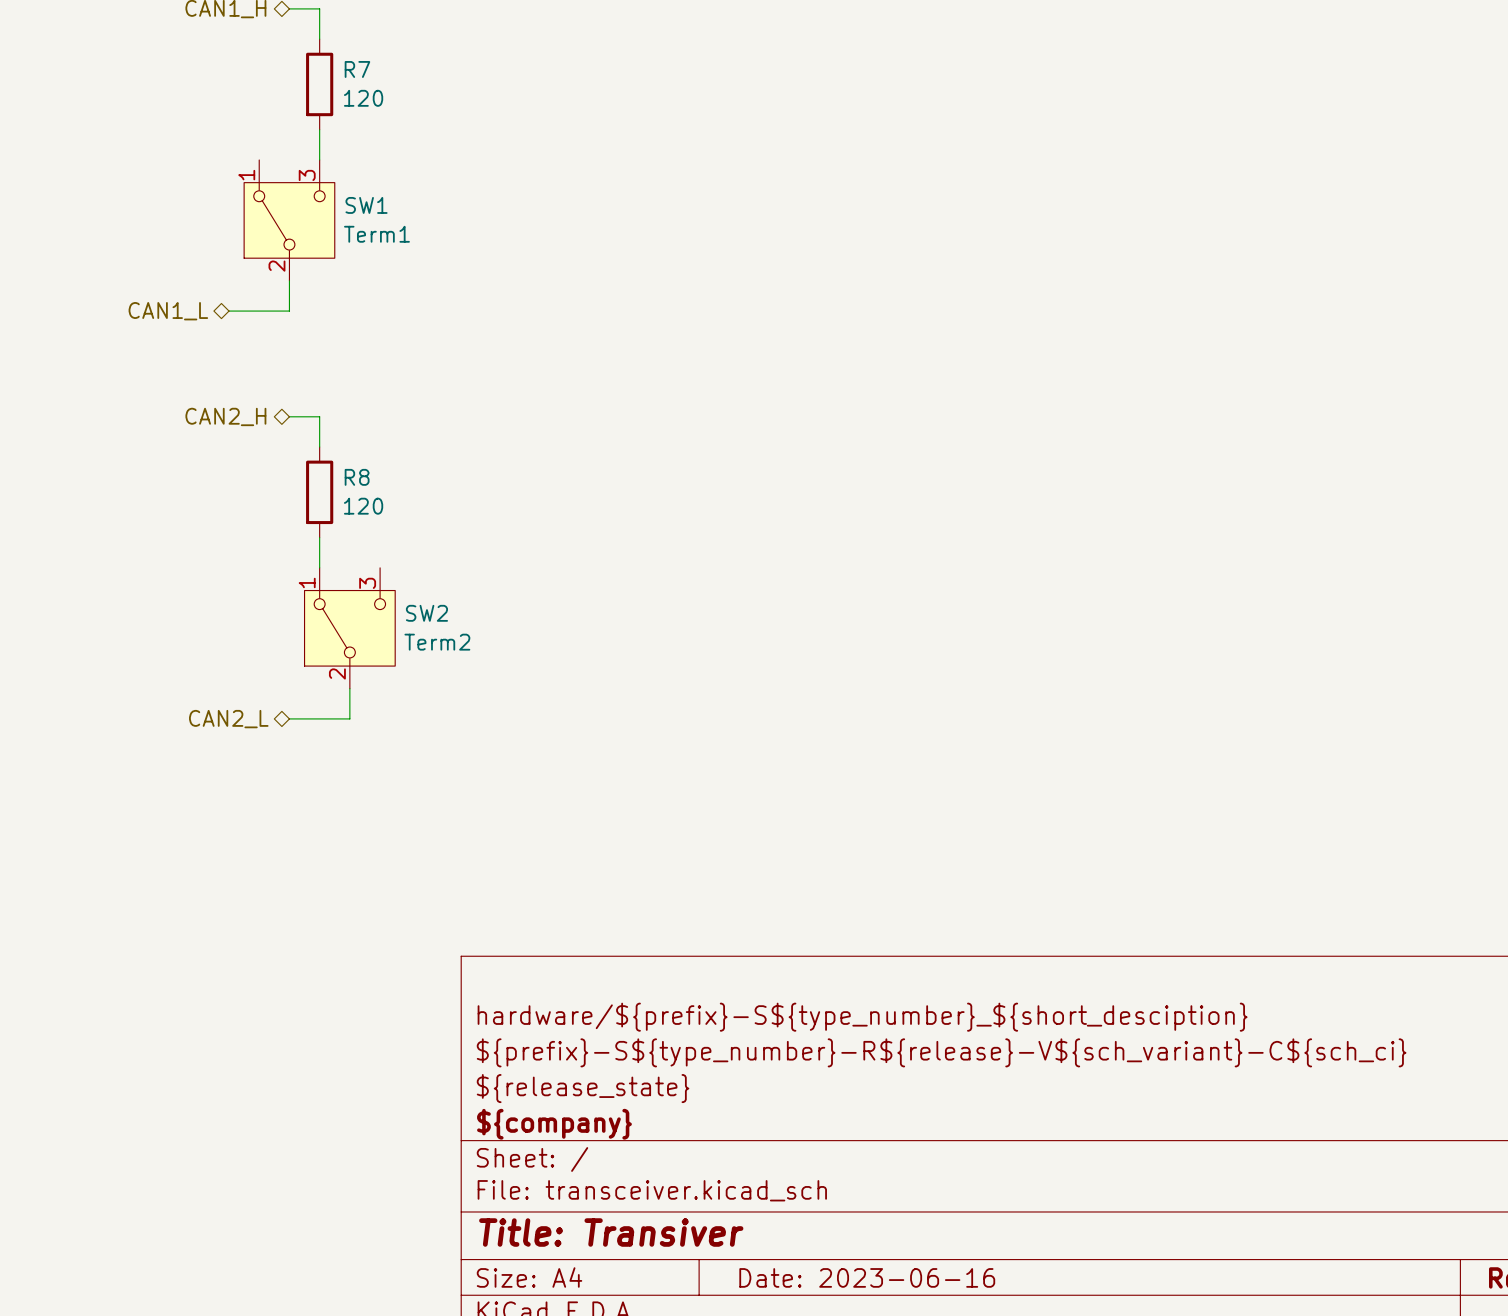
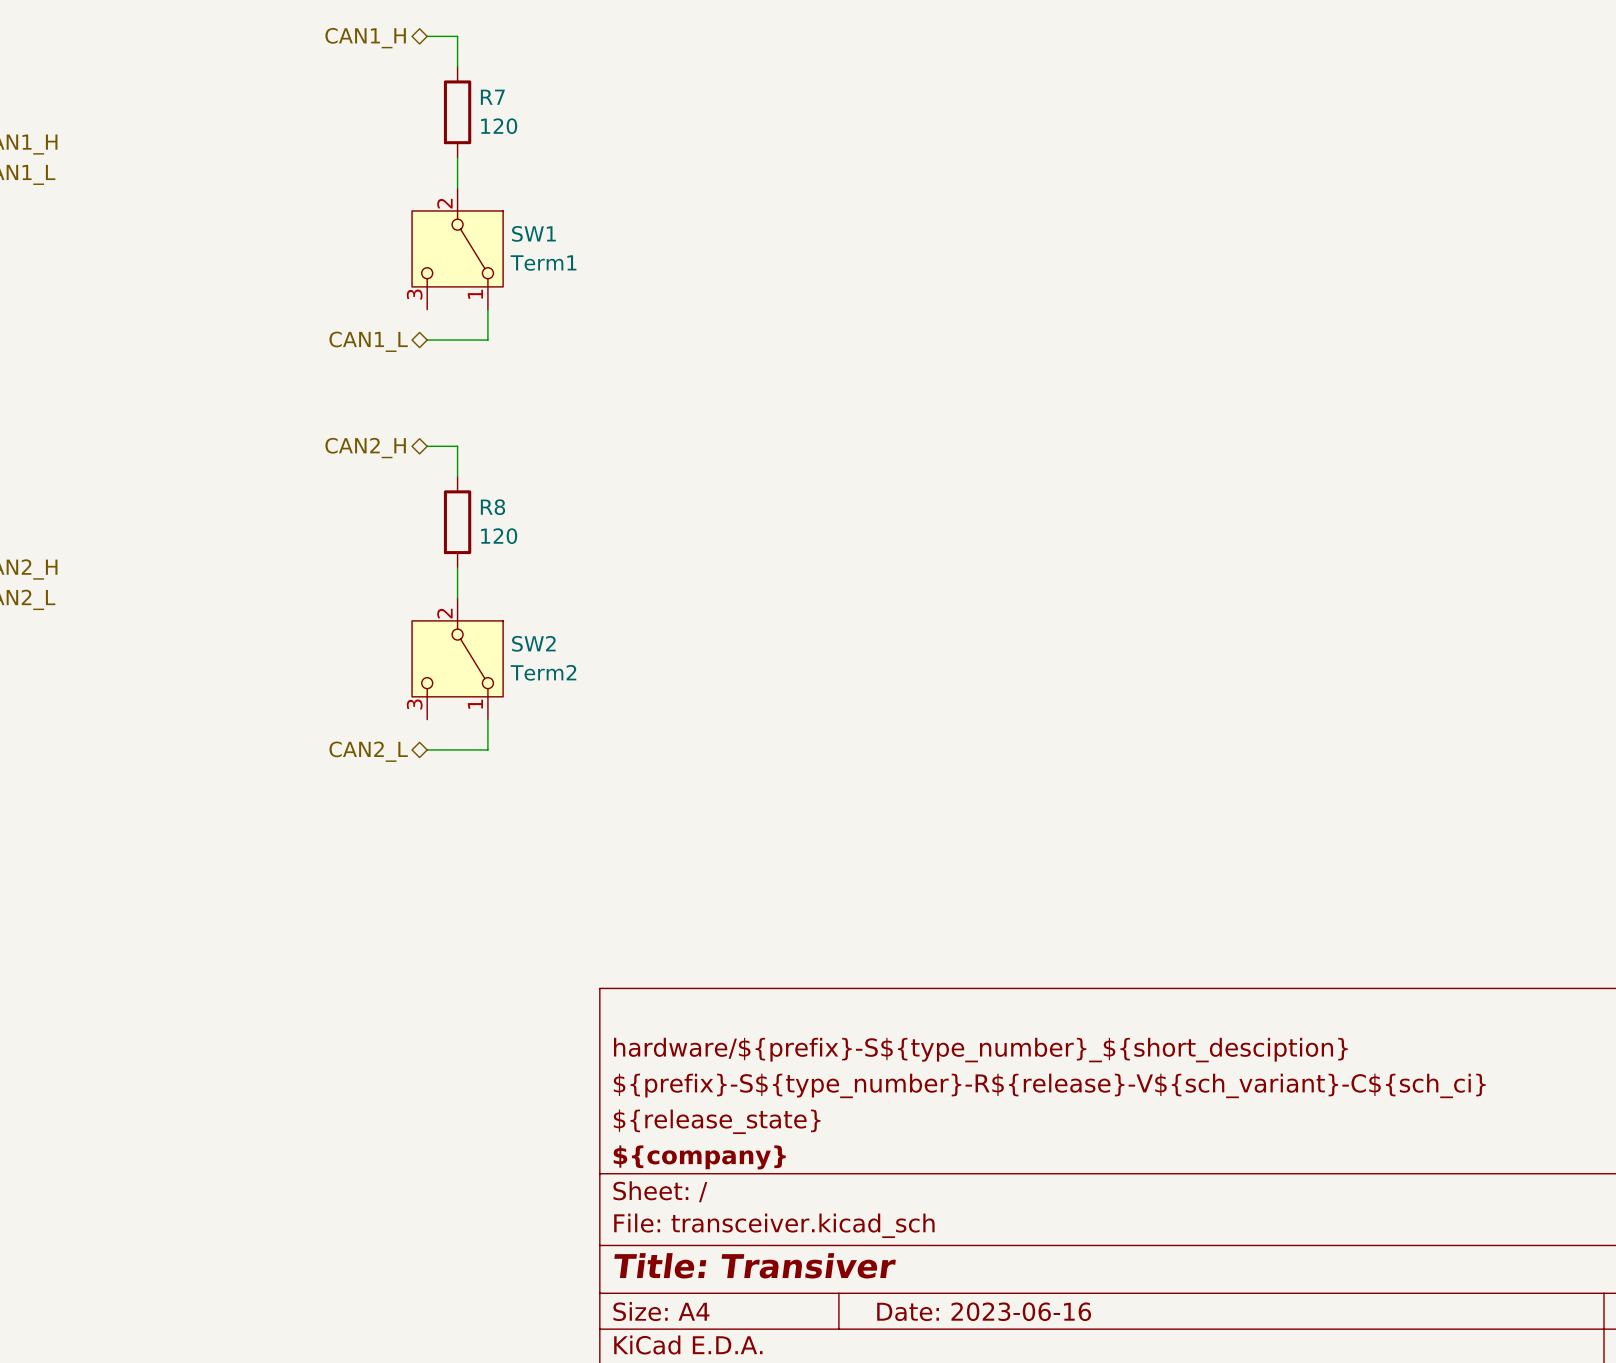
SW1 rotation: 0° (289, 220) -> 180° (457, 248)
wire: (289, 280) (289, 311) (229, 311) -> (487, 309) (487, 340) (427, 340)
hierarchical label position: CAN1_L (168, 311) -> CAN1_L (368, 341)
SW2 rotation: 0° (349, 628) -> 180° (457, 658)

